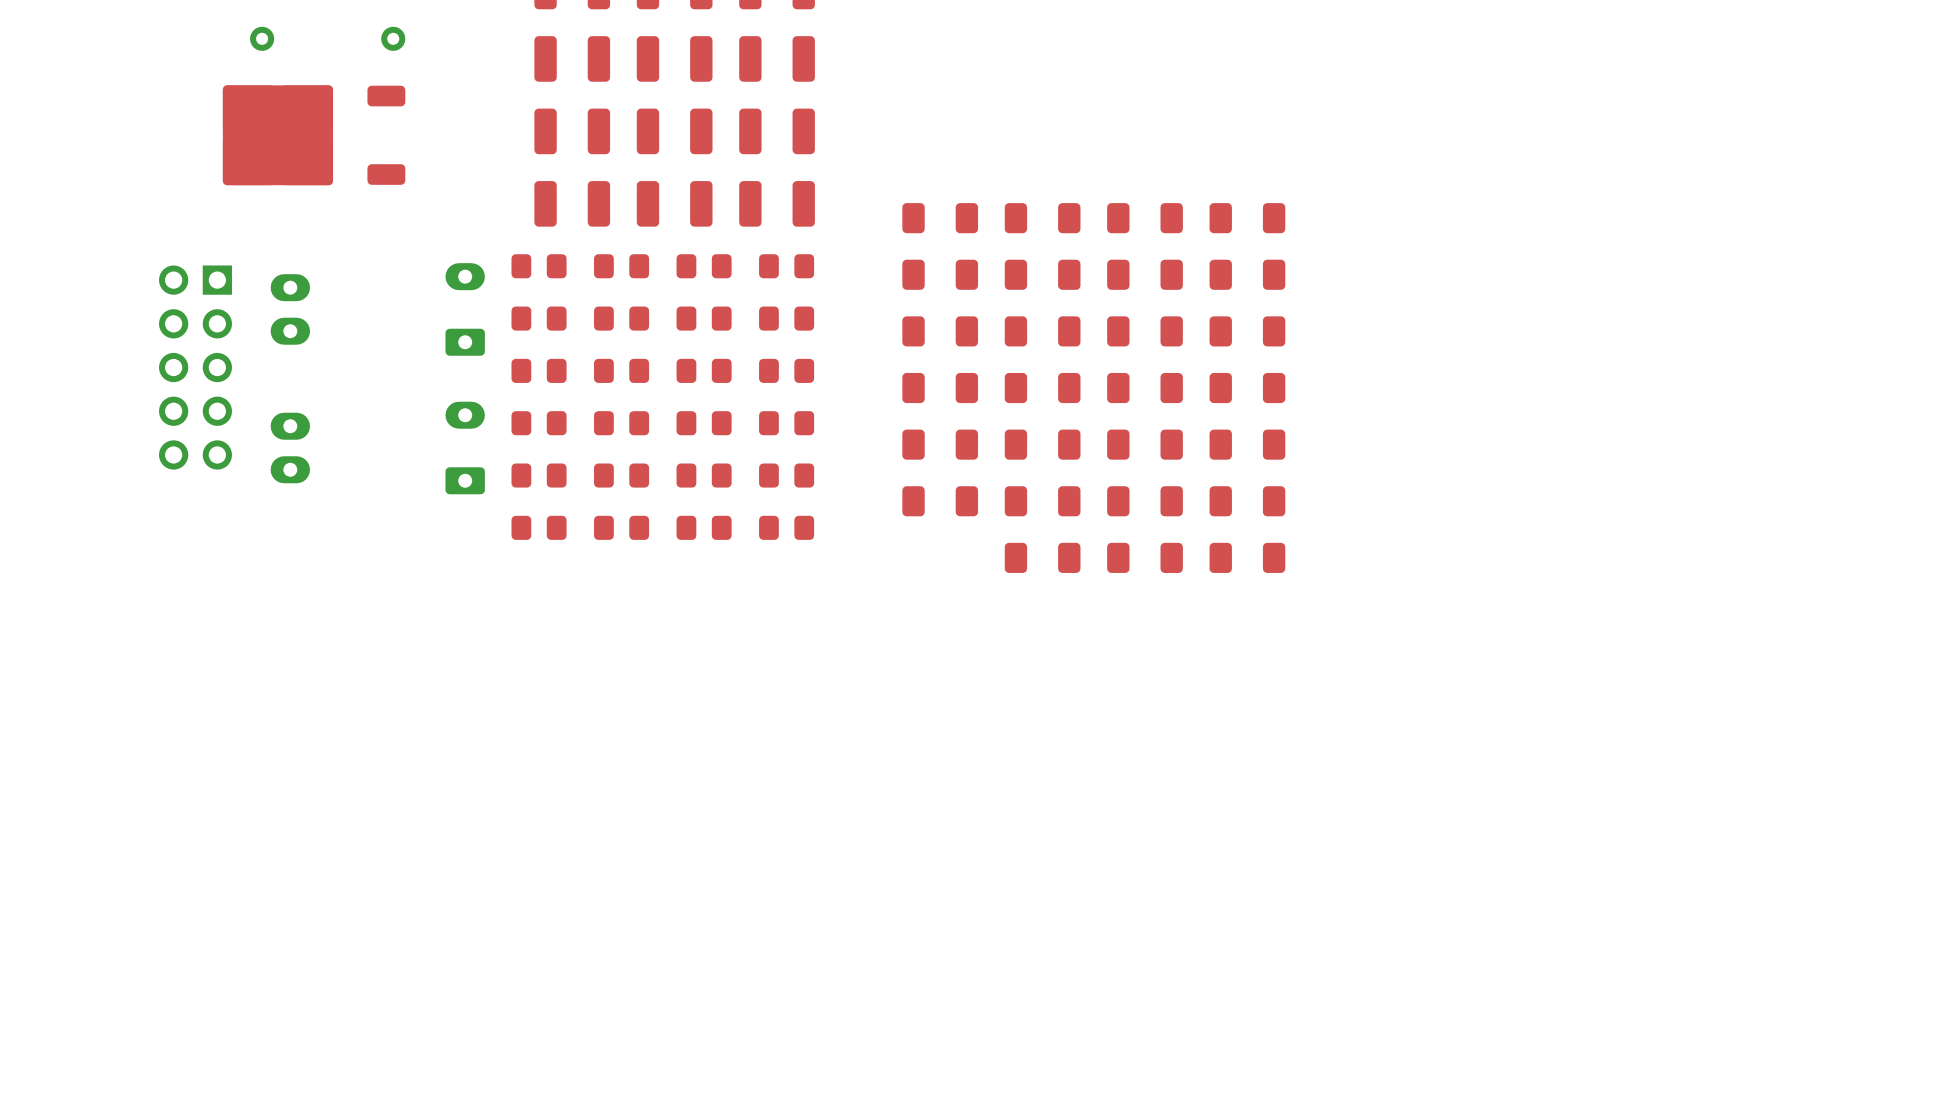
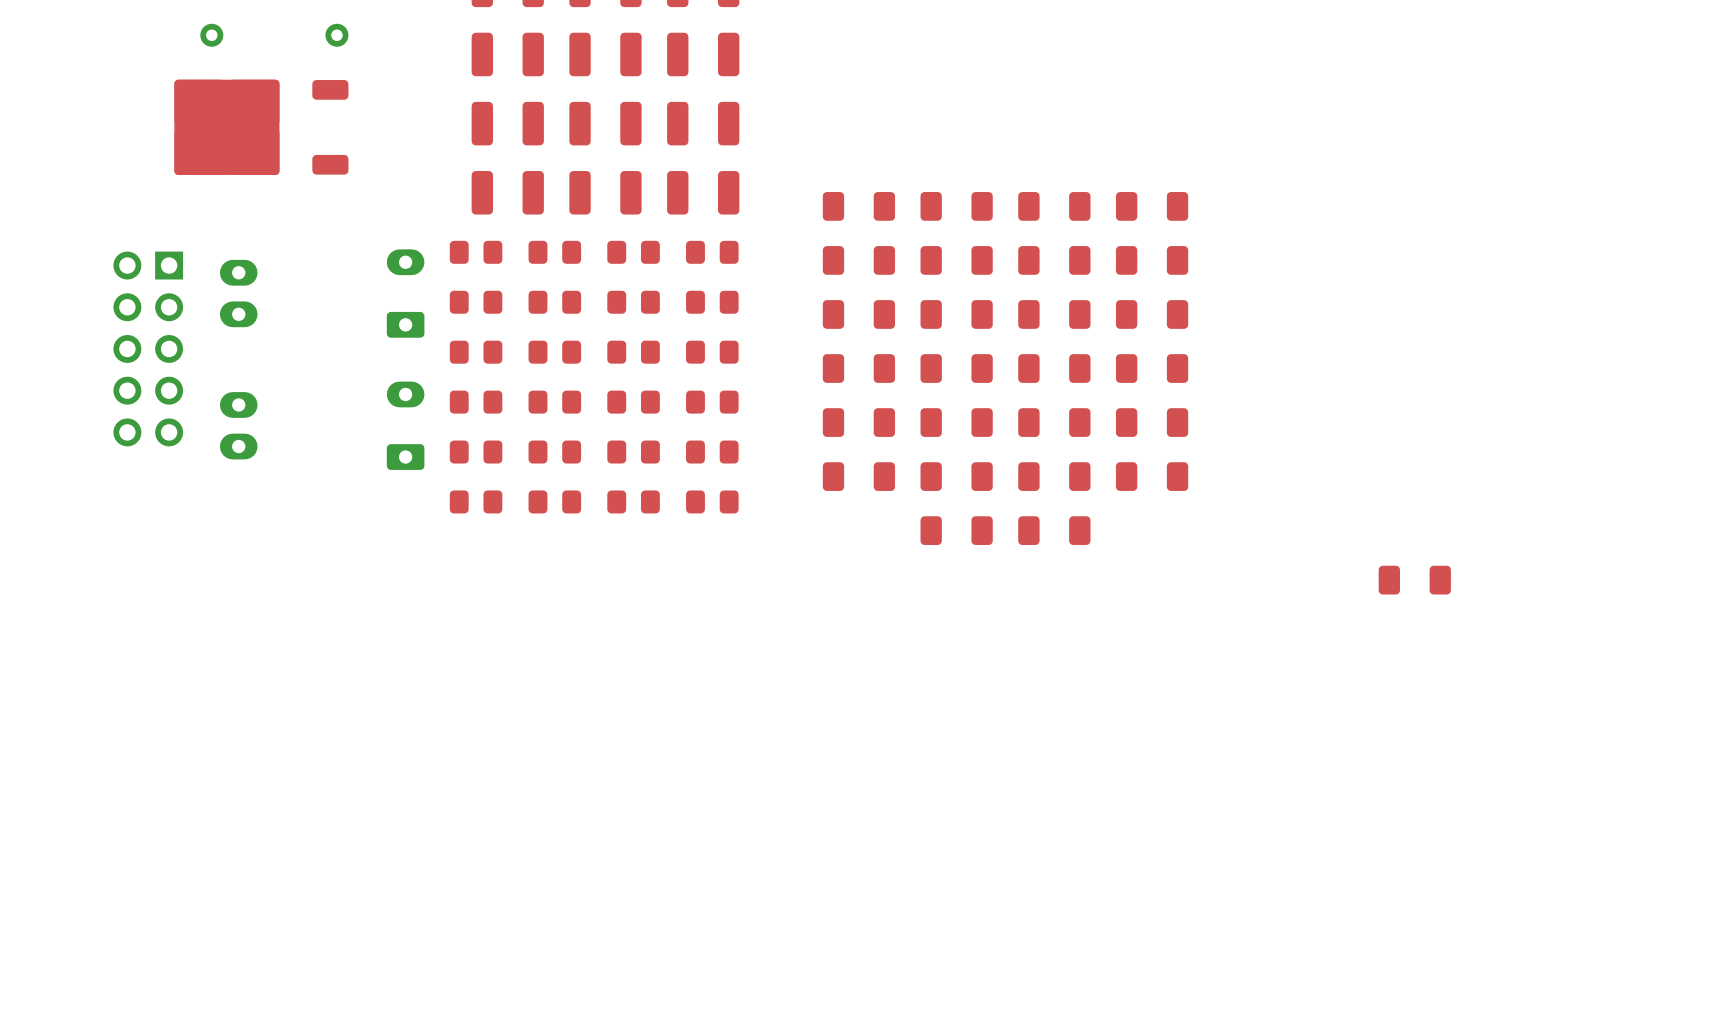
part position: (1247, 557) -> (1414, 580)

